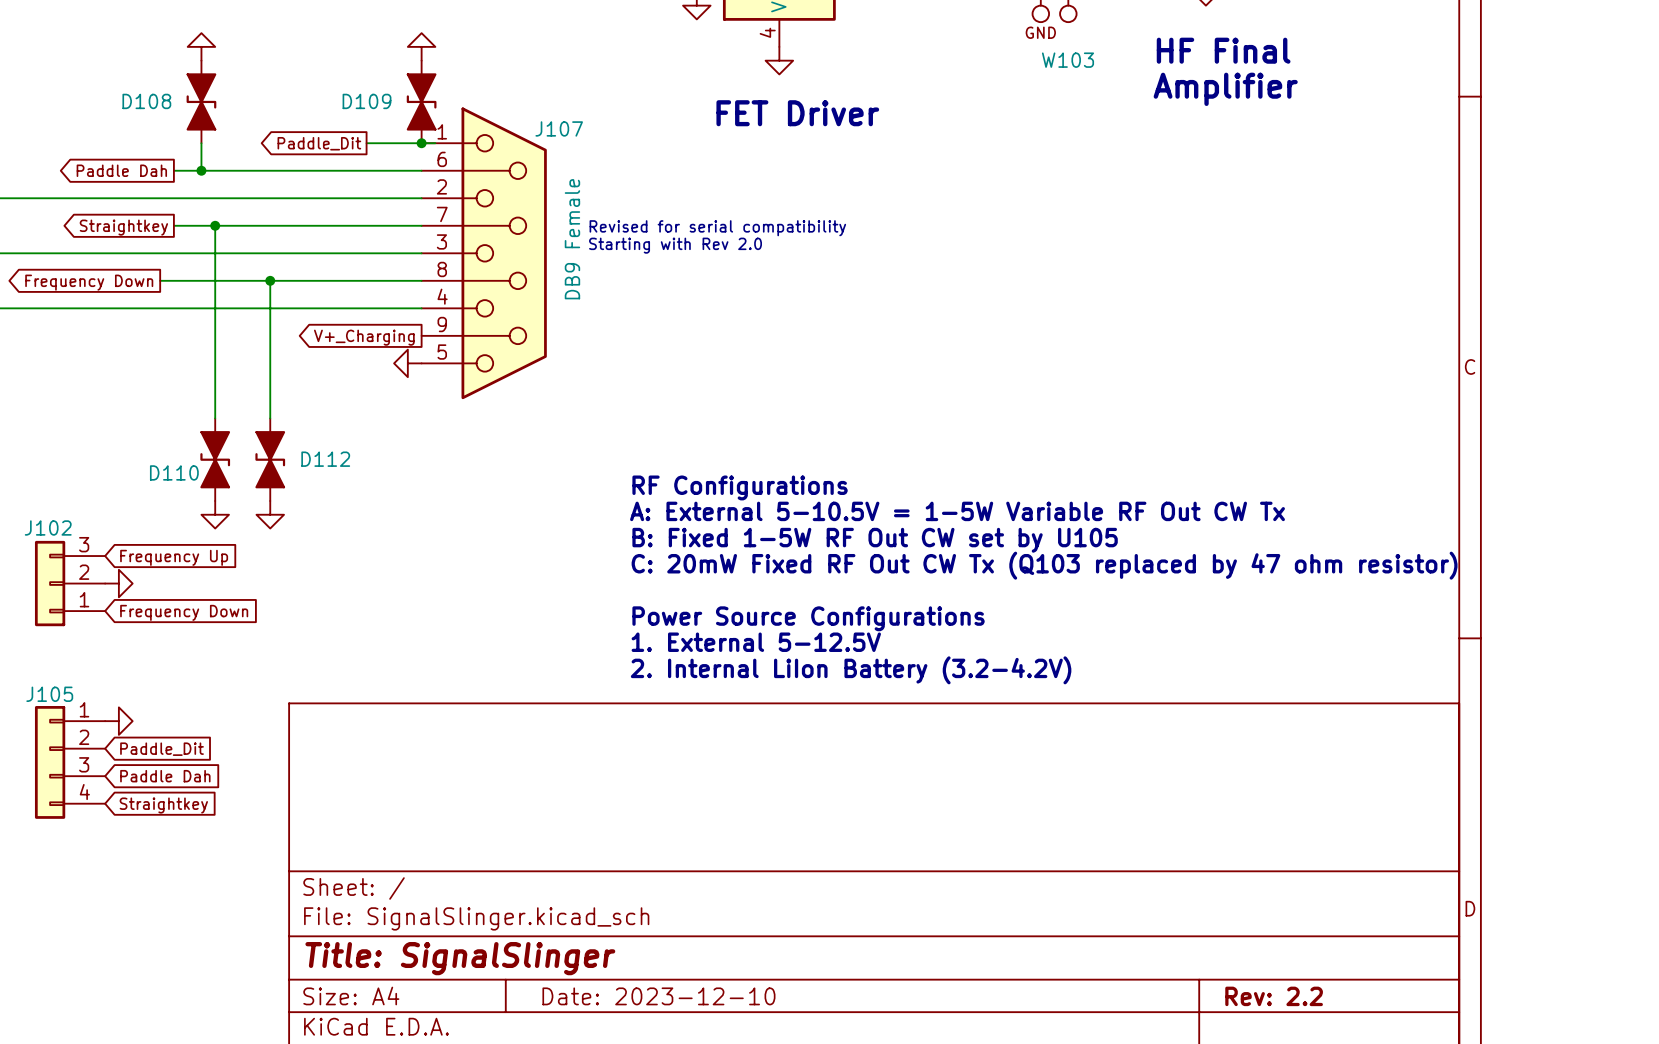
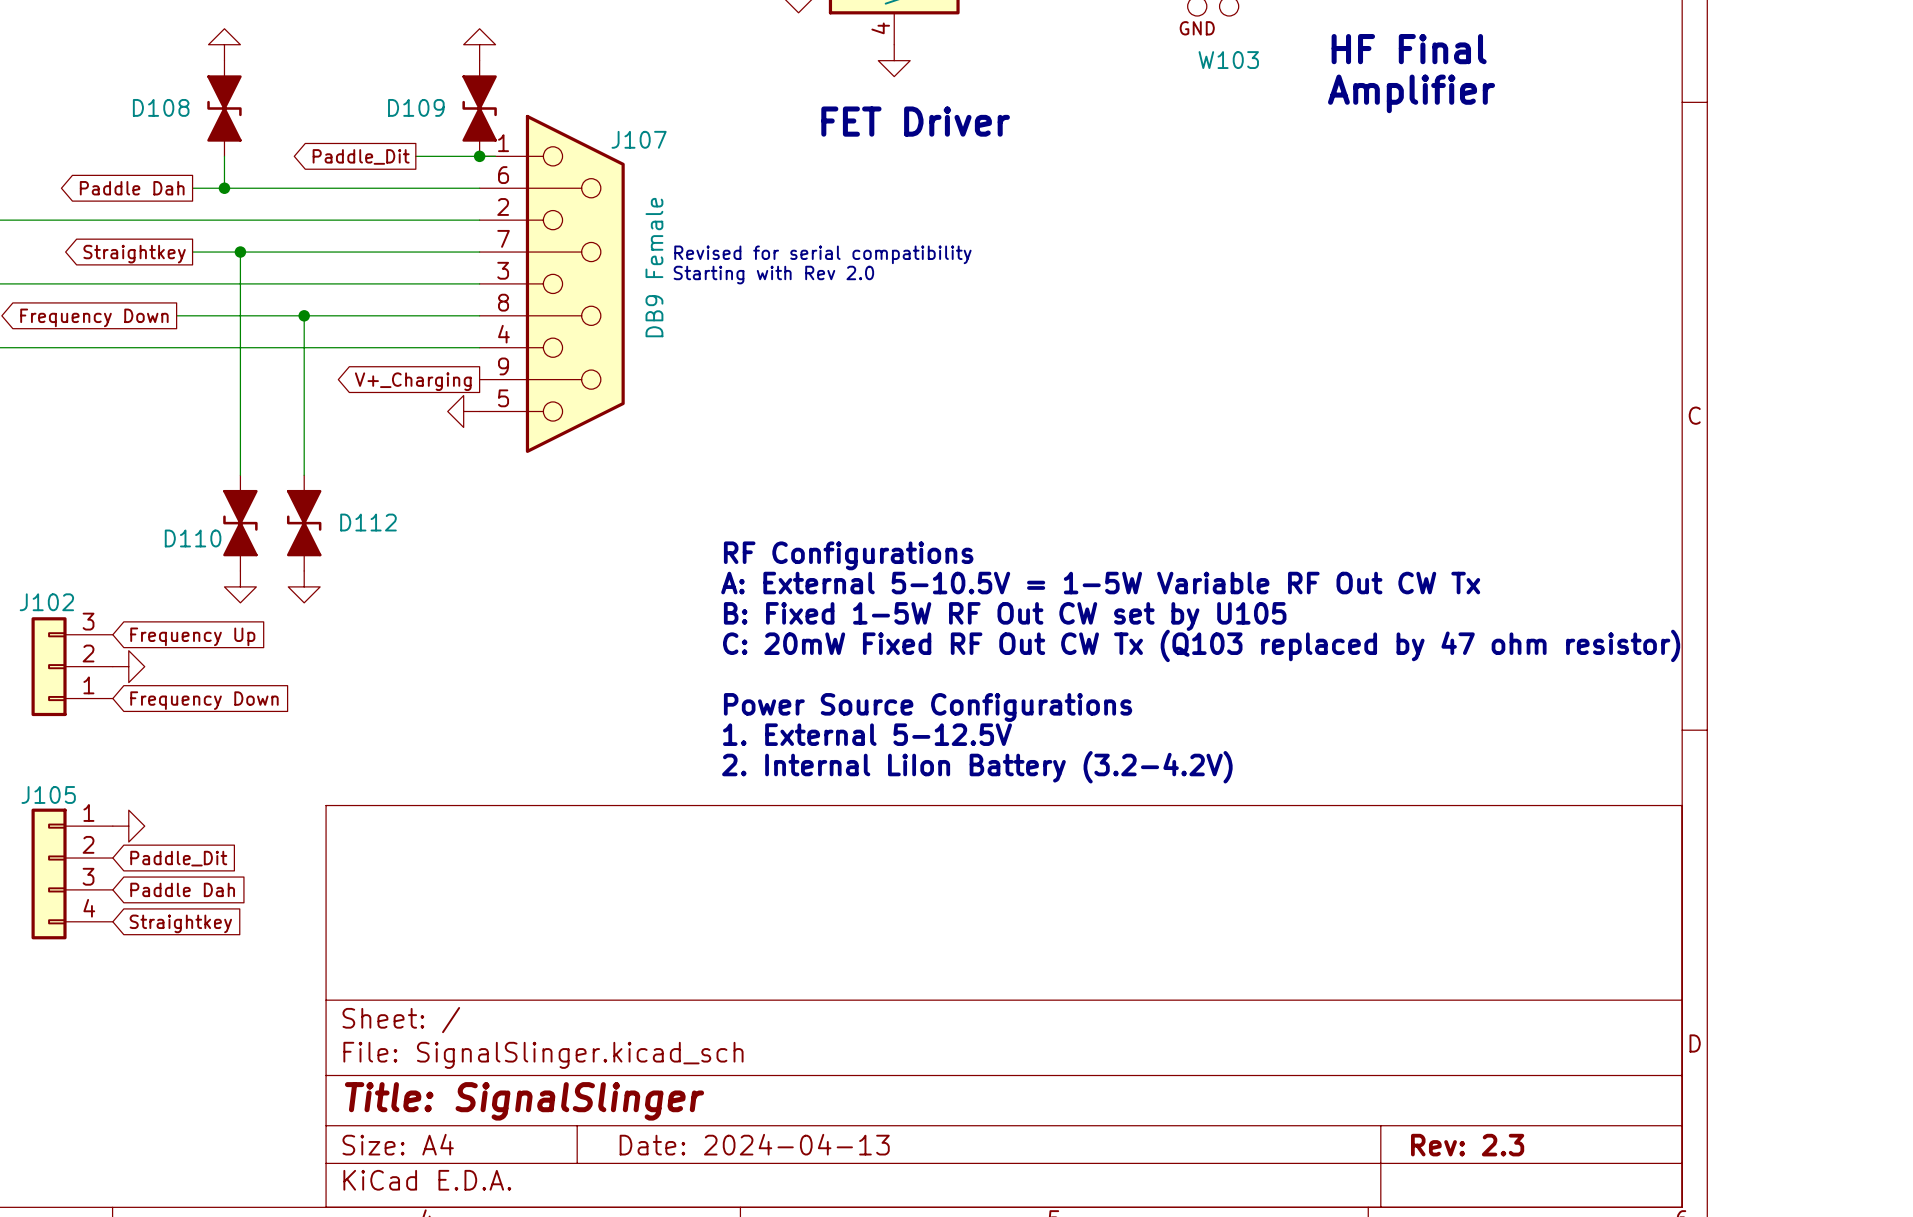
title block: Date: 2023-12-10 (658, 996) -> Date: 2024-04-13 (754, 1144)
title block: Rev: 2.2 (1274, 996) -> Rev: 2.3 (1467, 1145)

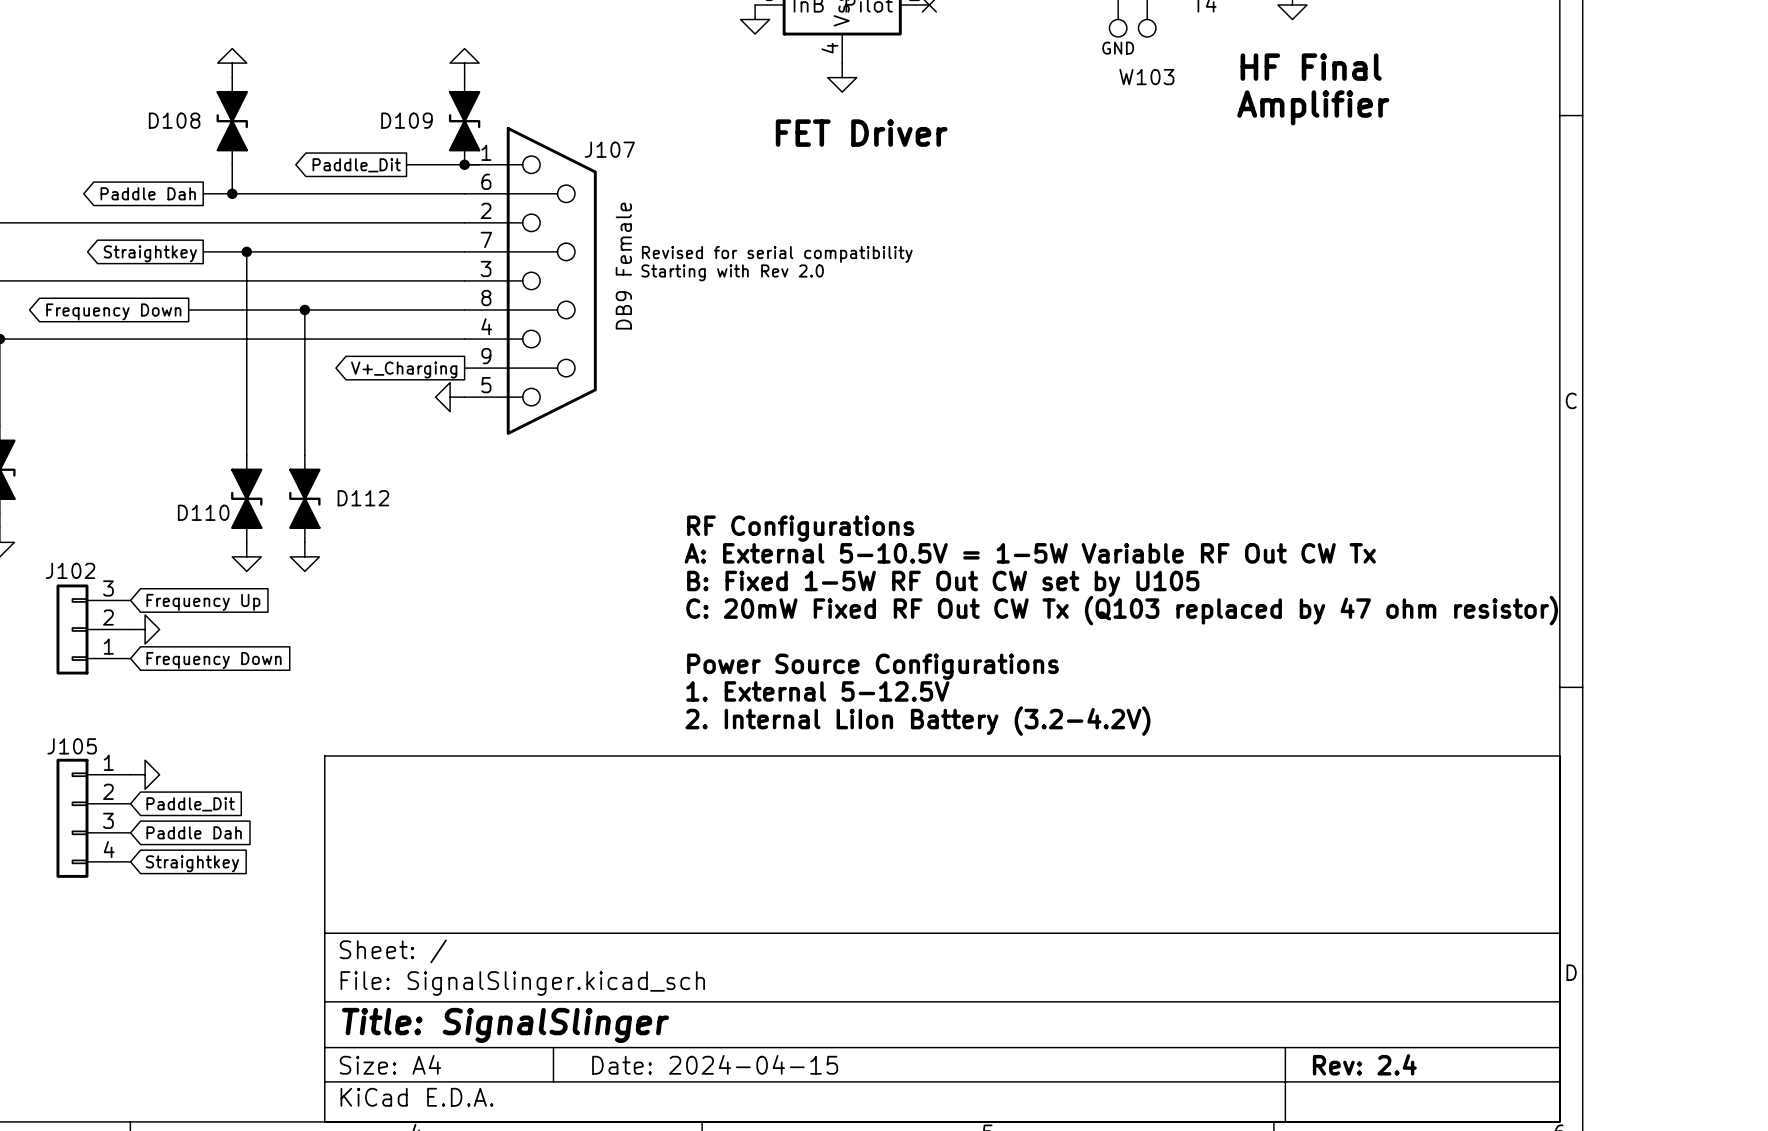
title block: Date: 2024-04-13 (754, 1144) -> Date: 2024-04-15 (715, 1064)
title block: Rev: 2.3 (1467, 1145) -> Rev: 2.4 (1364, 1064)

